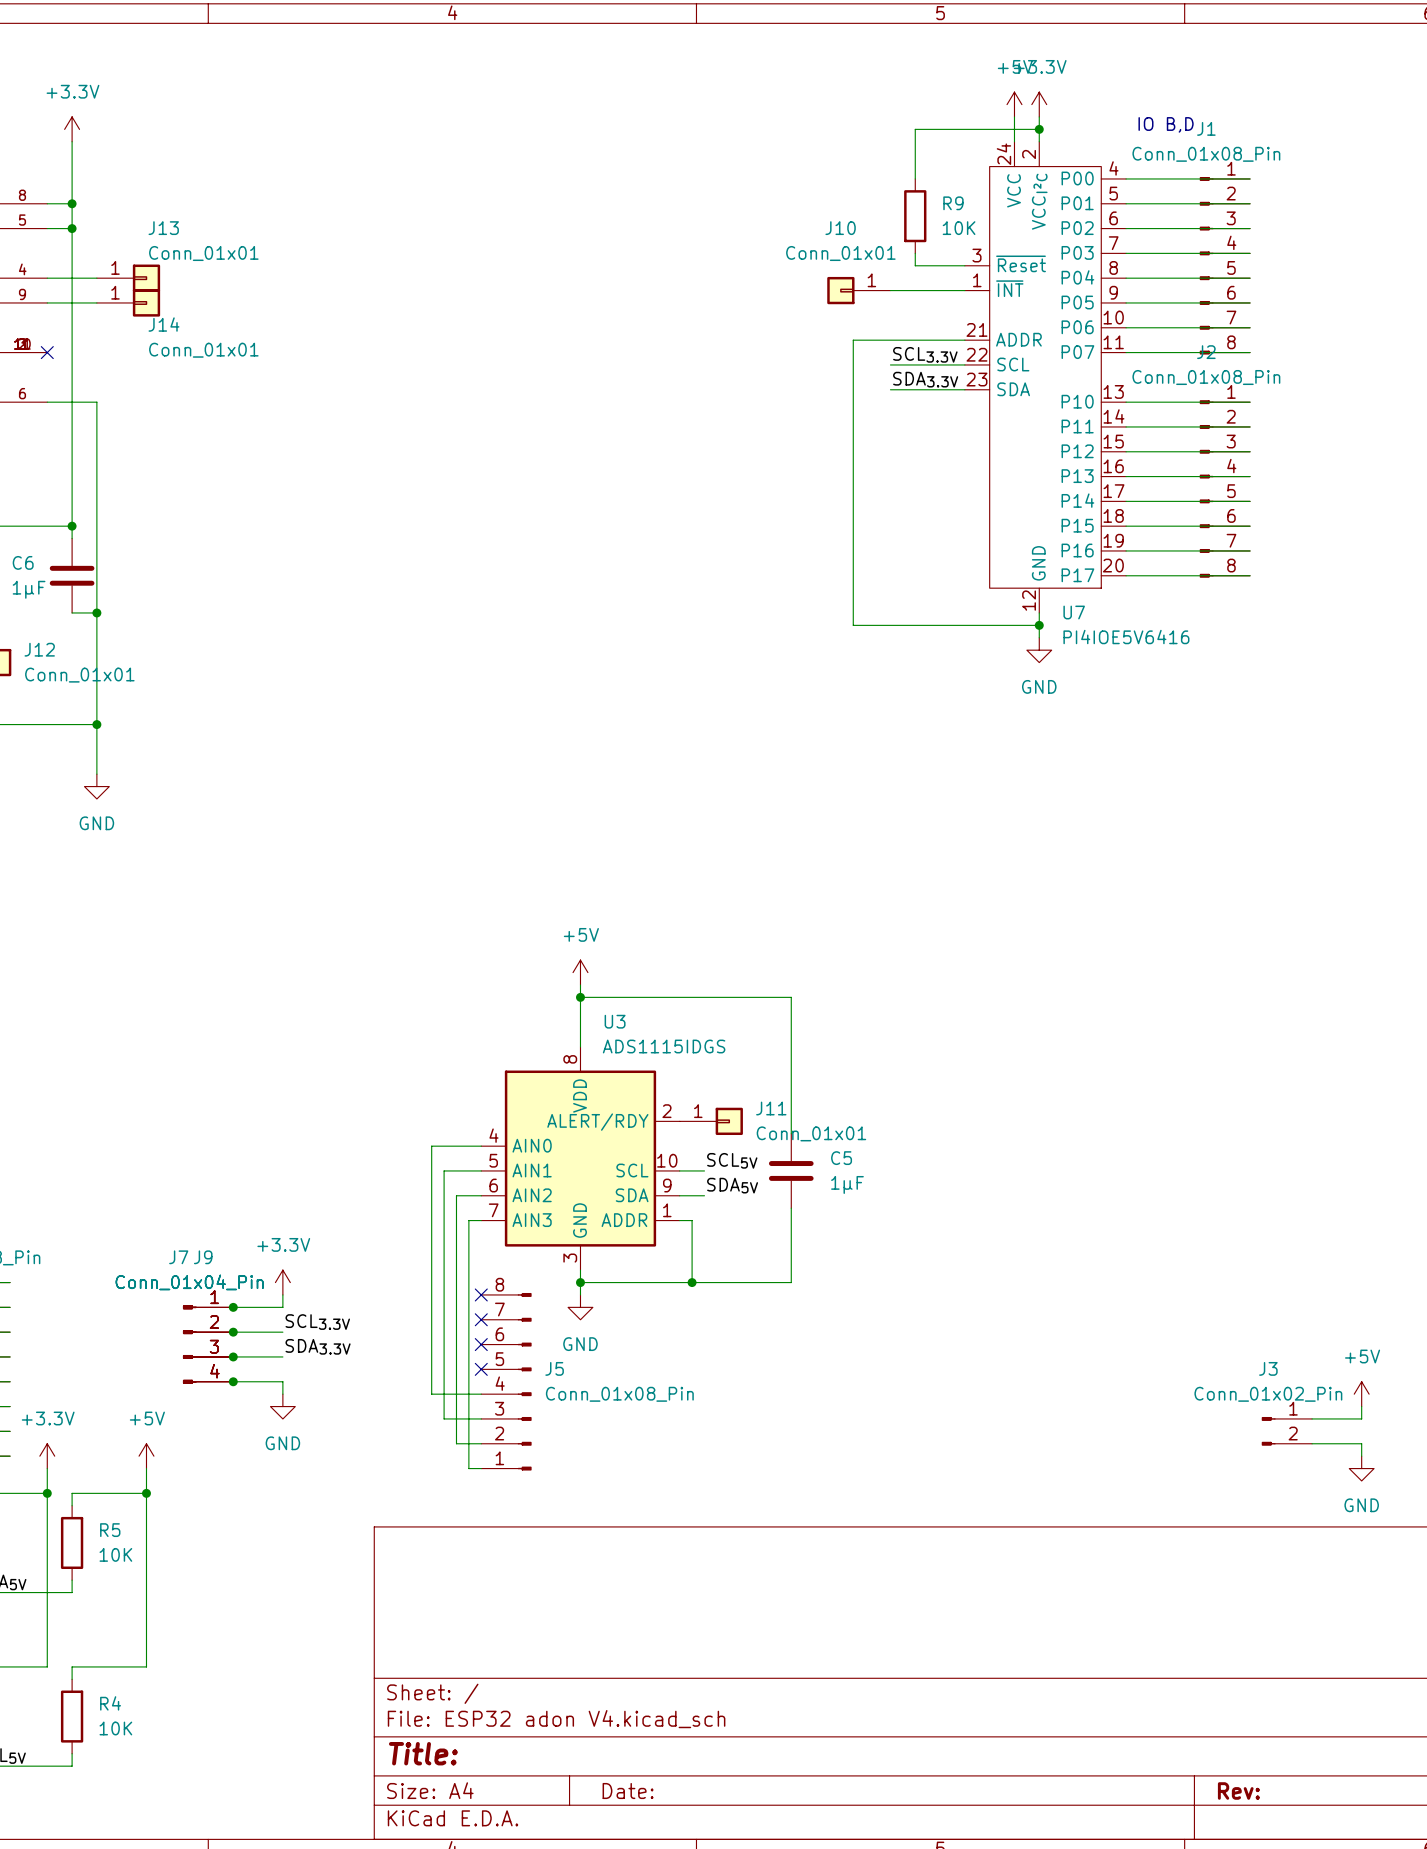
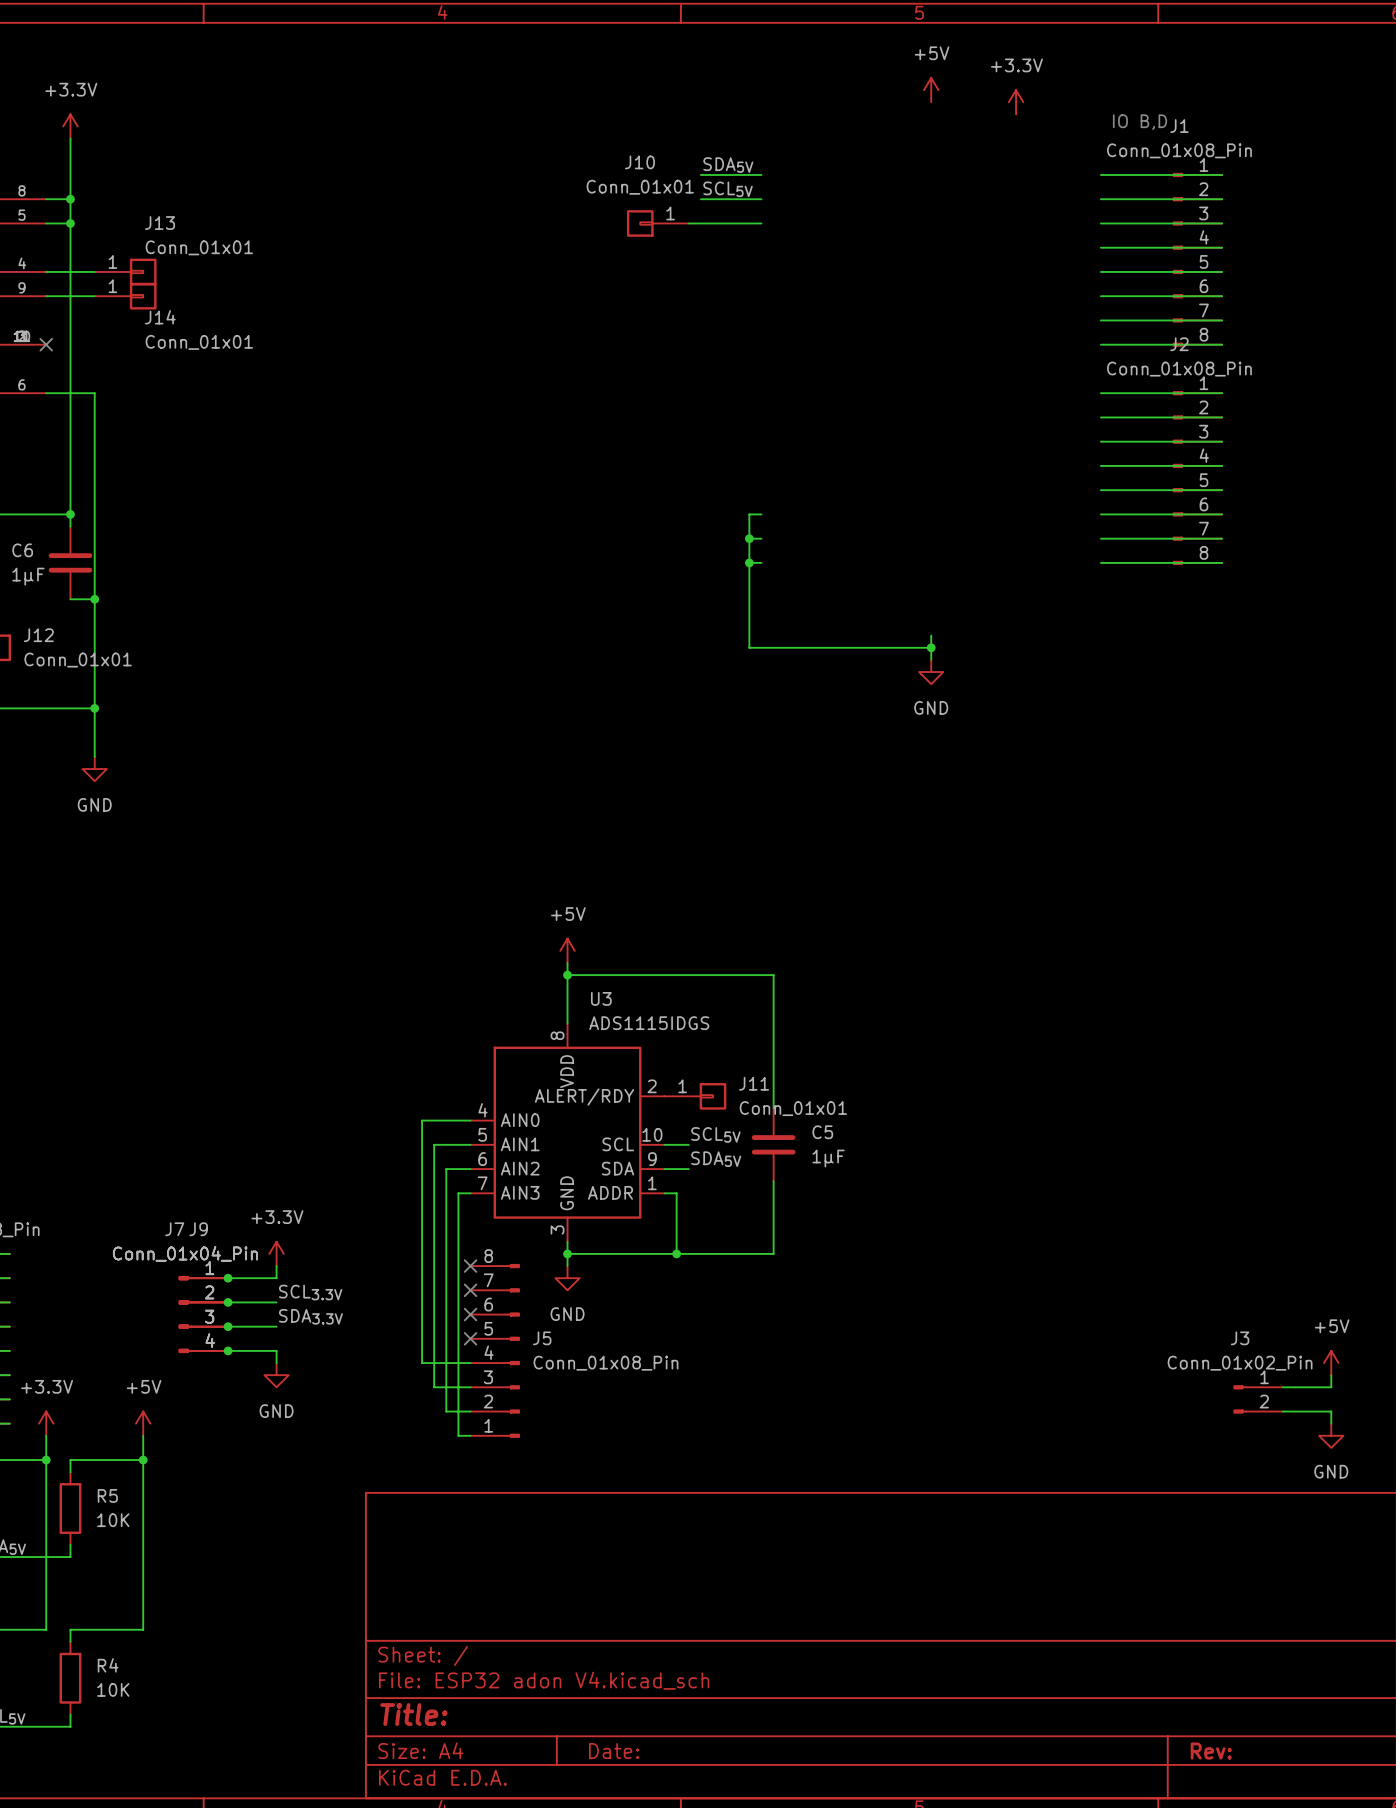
power symbol position: +5V (1014, 104) -> +5V (931, 90)
wire: (1014, 116) (1014, 141) -> none
wire: (1039, 116) (1039, 141) -> none
wire: (1039, 129) (915, 129) (915, 178) -> none
junction: (1039, 129) -> none
label: none -> SDA5V (728, 165)
wire: none -> (700, 174) (761, 174)
label: none -> SCL5V (728, 189)
wire: none -> (700, 199) (761, 199)
R9: 10K (915, 216) -> none
wire: (915, 253) (915, 265) (964, 265) -> none
J10 position: (858, 290) -> (657, 223)
wire: (890, 290) (964, 290) -> (688, 223) (761, 223)
wire: (964, 340) (853, 340) (853, 625) (1039, 625) -> none
label: SCL3.3V (925, 354) -> none
wire: (890, 364) (964, 364) -> none
U7: PI4IOE5V6416 (1045, 377) -> none
label: SDA3.3V (925, 379) -> none
wire: (890, 389) (964, 389) -> none
wire: none -> (761, 514) (749, 514) (749, 647) (931, 647)
wire: none -> (749, 538) (761, 538)
junction: none -> (749, 538)
wire: none -> (749, 562) (761, 562)
junction: none -> (749, 562)
wire: (1039, 612) (1039, 637) -> (931, 635) (931, 659)
junction: (1039, 625) -> none
power symbol position: GND (1039, 650) -> GND (931, 672)
junction: none -> (931, 647)

